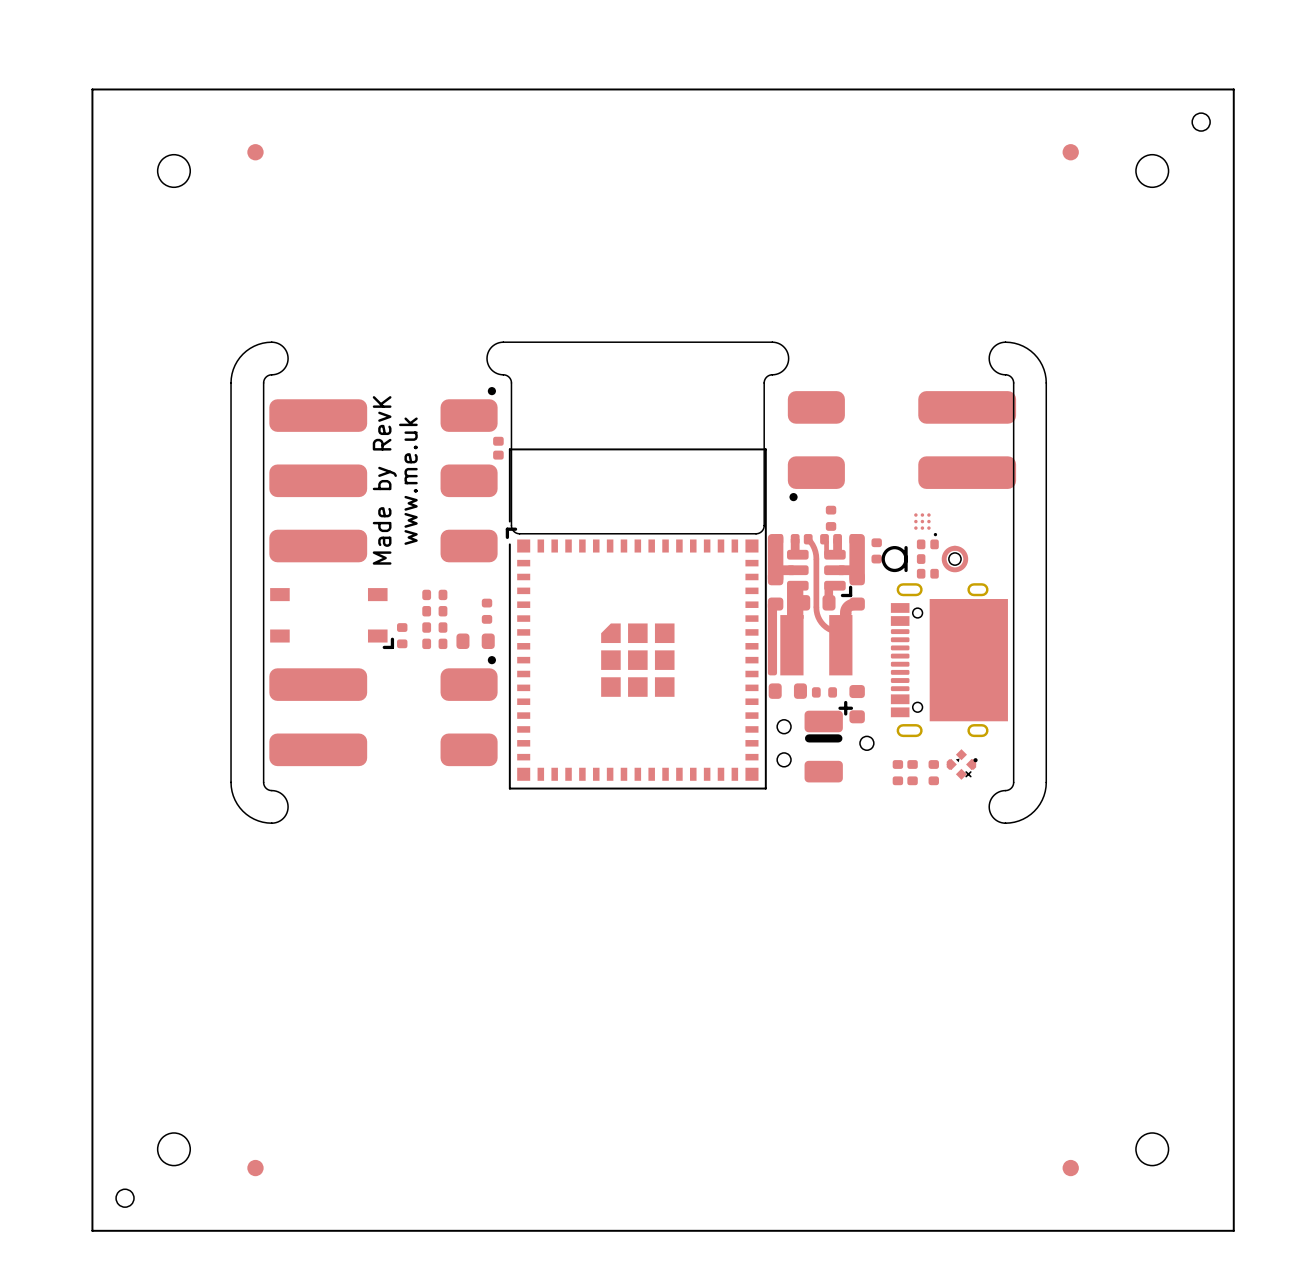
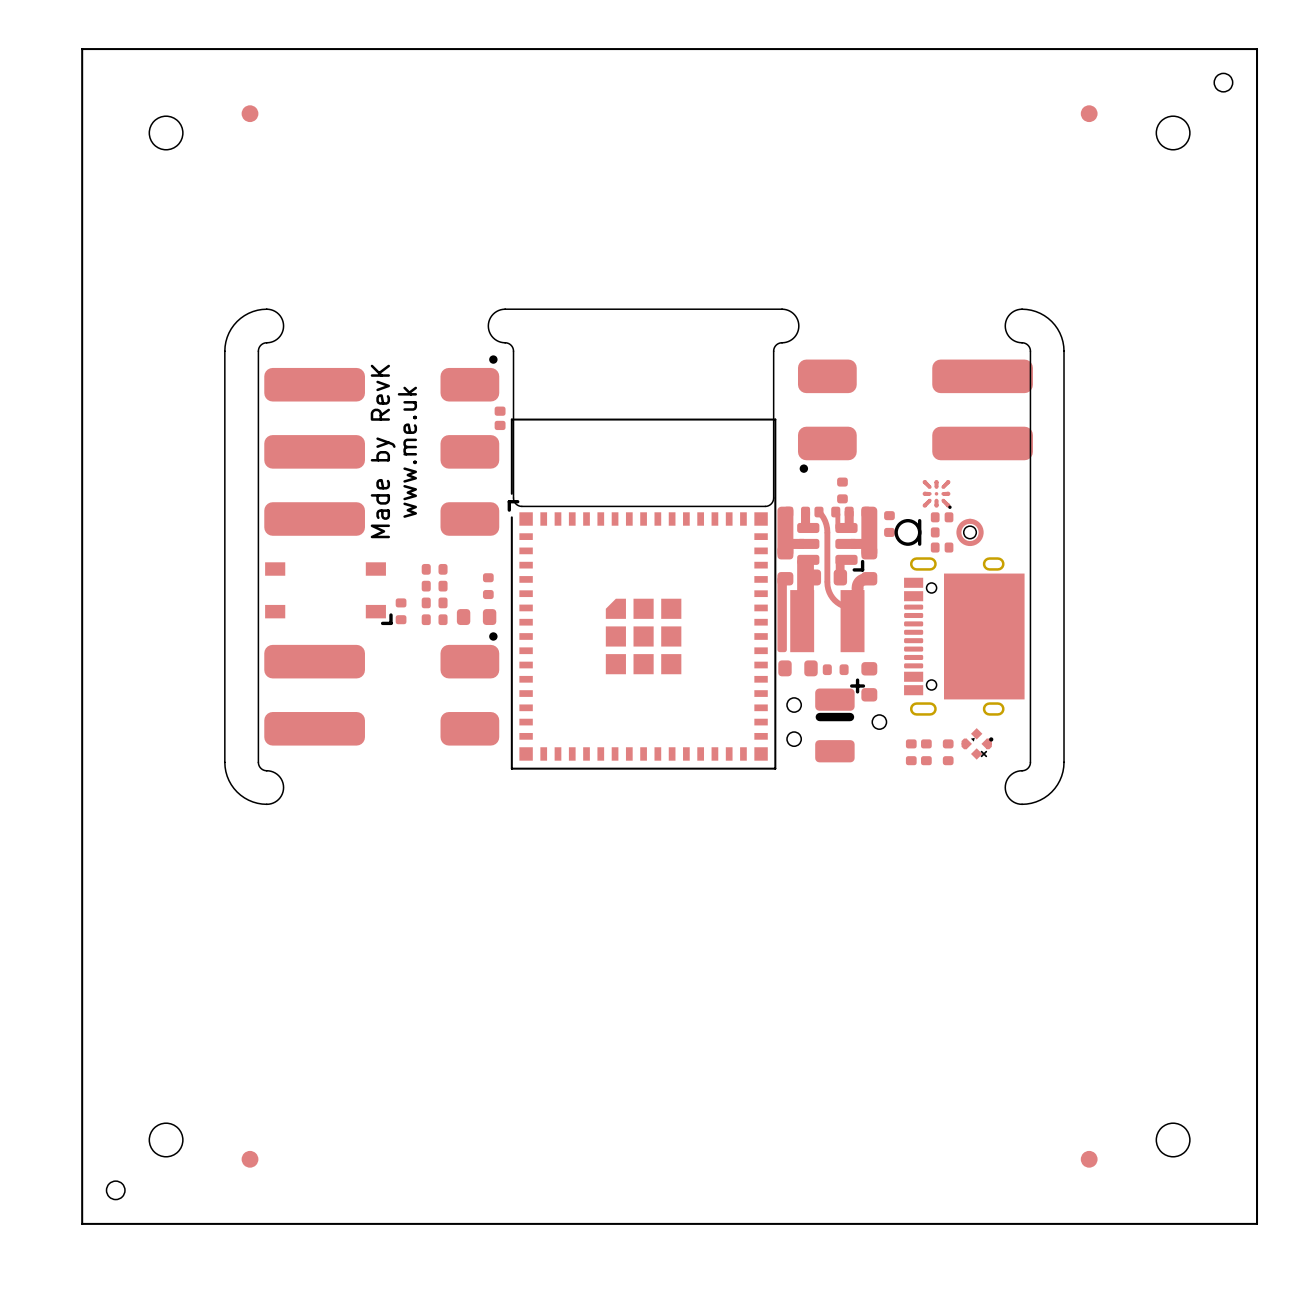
part footprint: [914, 513, 938, 537] -> [922, 479, 952, 509]

